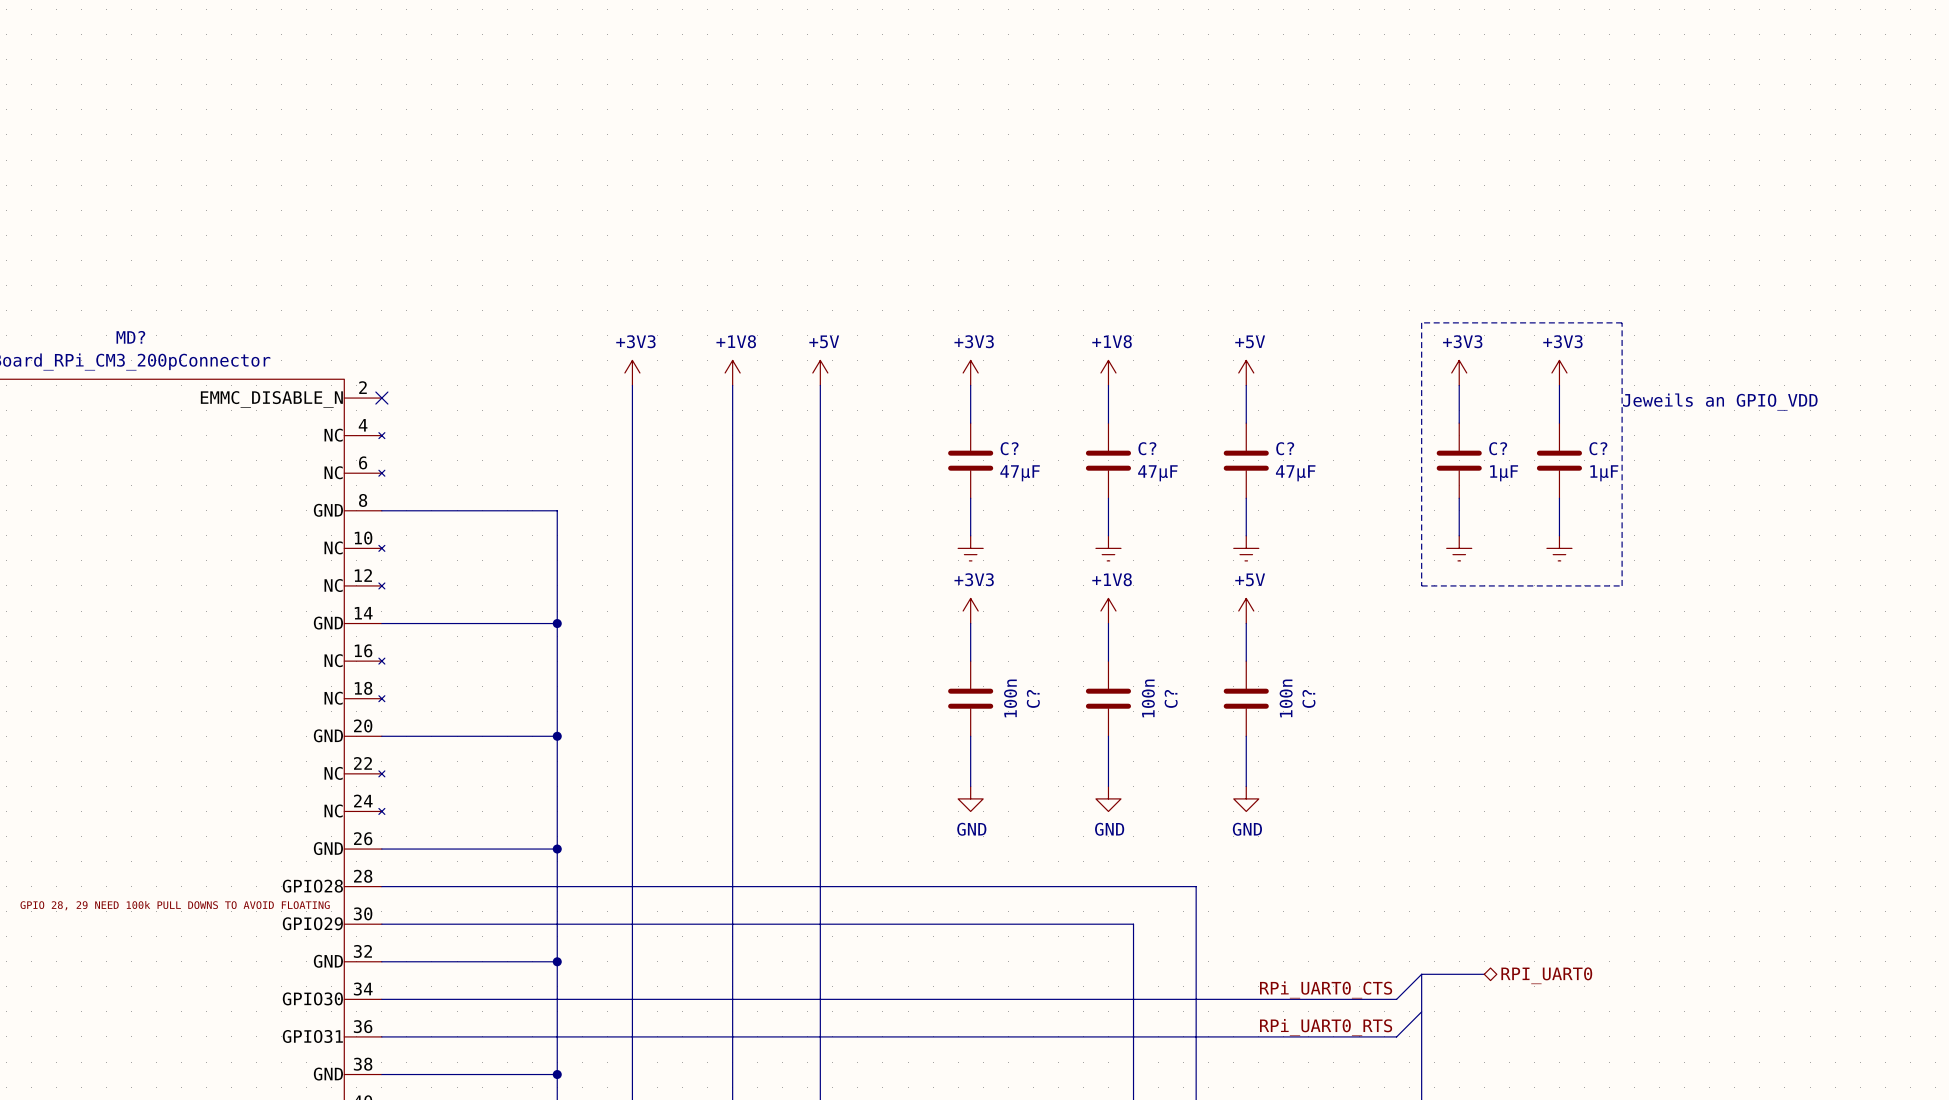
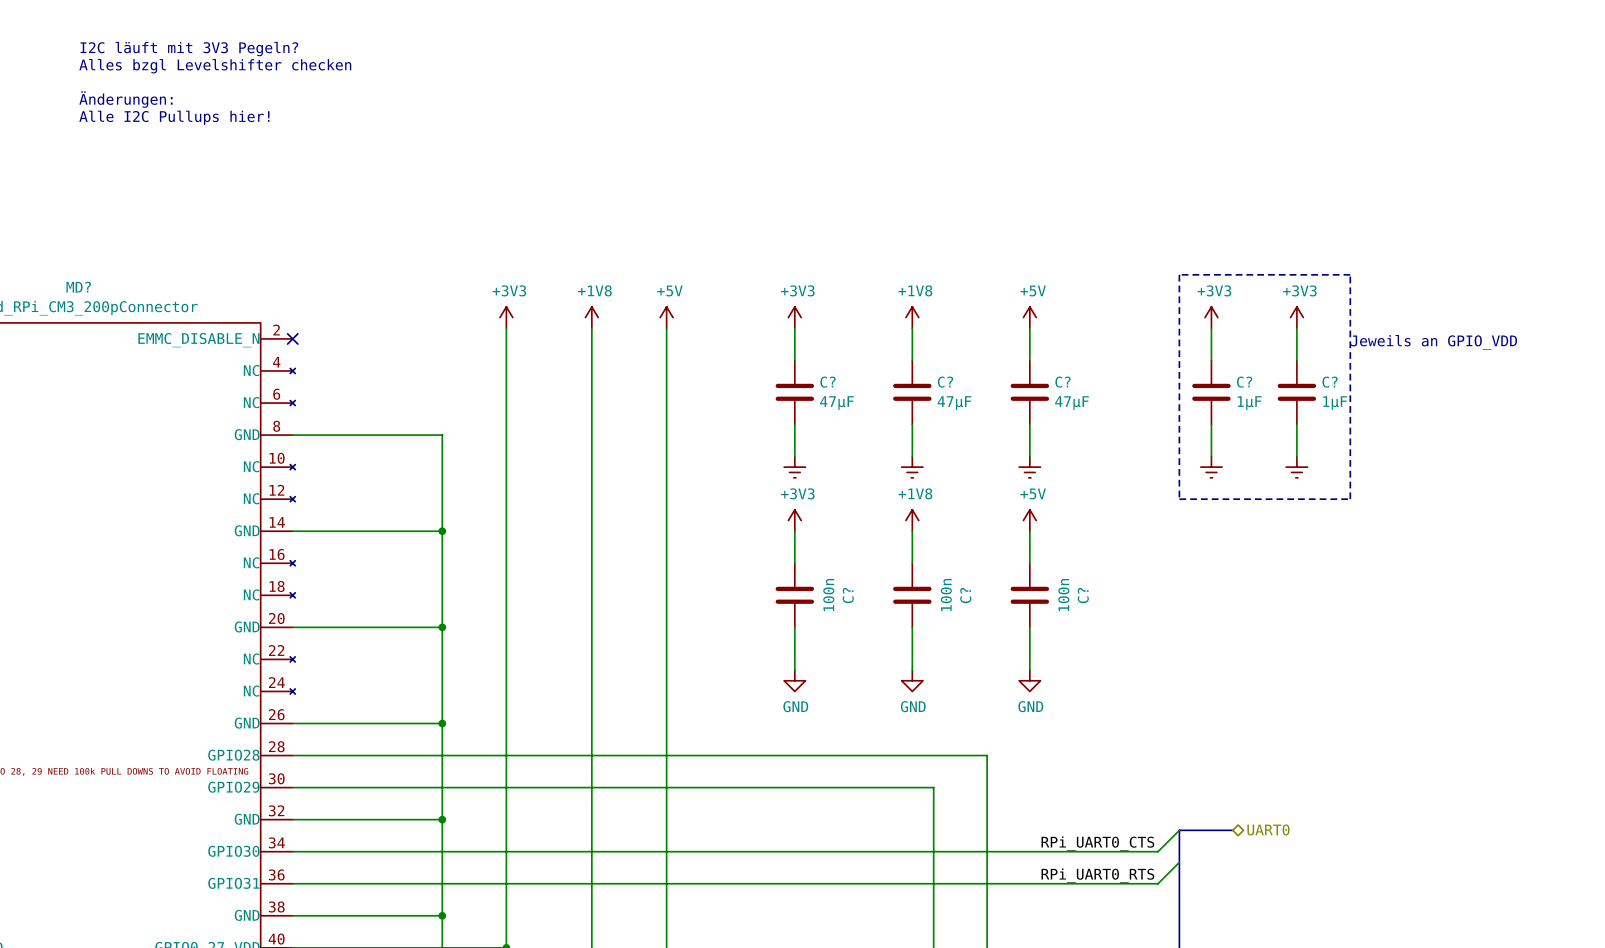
text: none -> I2C läuft mit 3V3 Pegeln? (189, 49)
text: none -> Alles bzgl Levelshifter checken (215, 66)
text: none -> Änderungen: (125, 99)
text: none -> Alle I2C Pullups hier! (174, 117)
hierarchical label: RPI_UART0 (1546, 975) -> UART0 (1268, 829)

